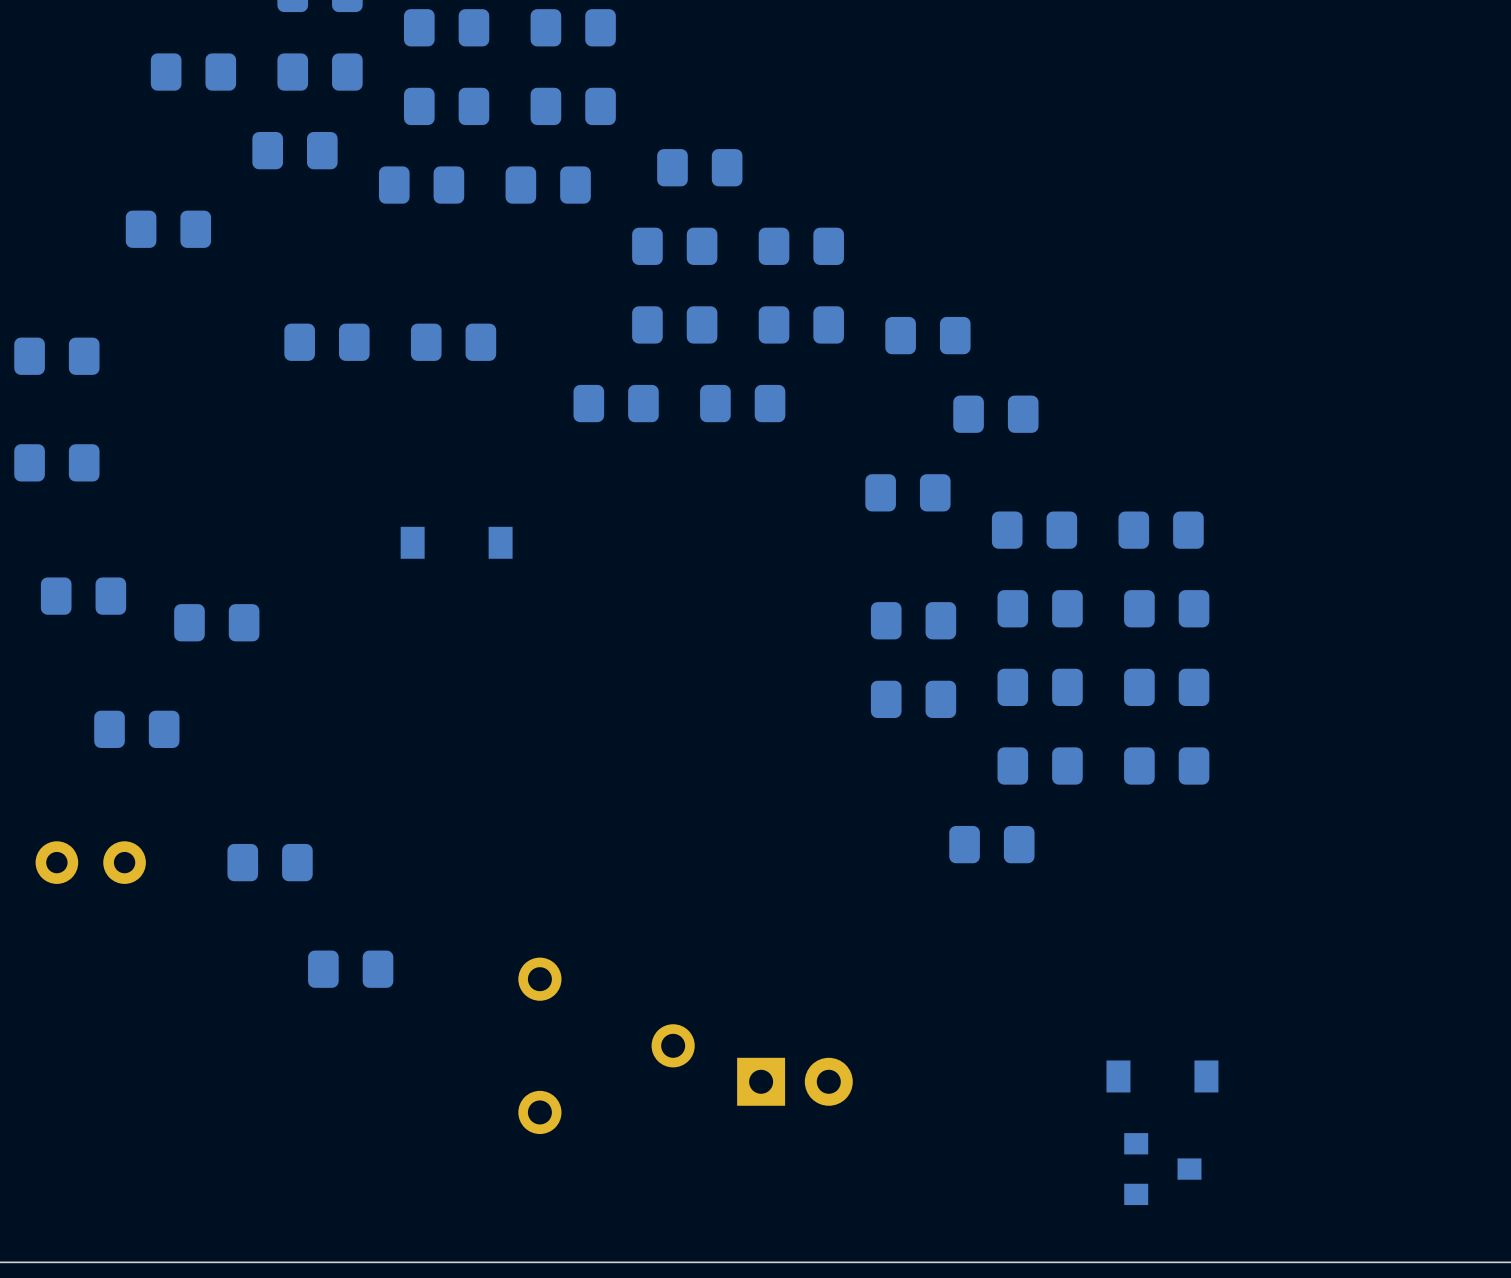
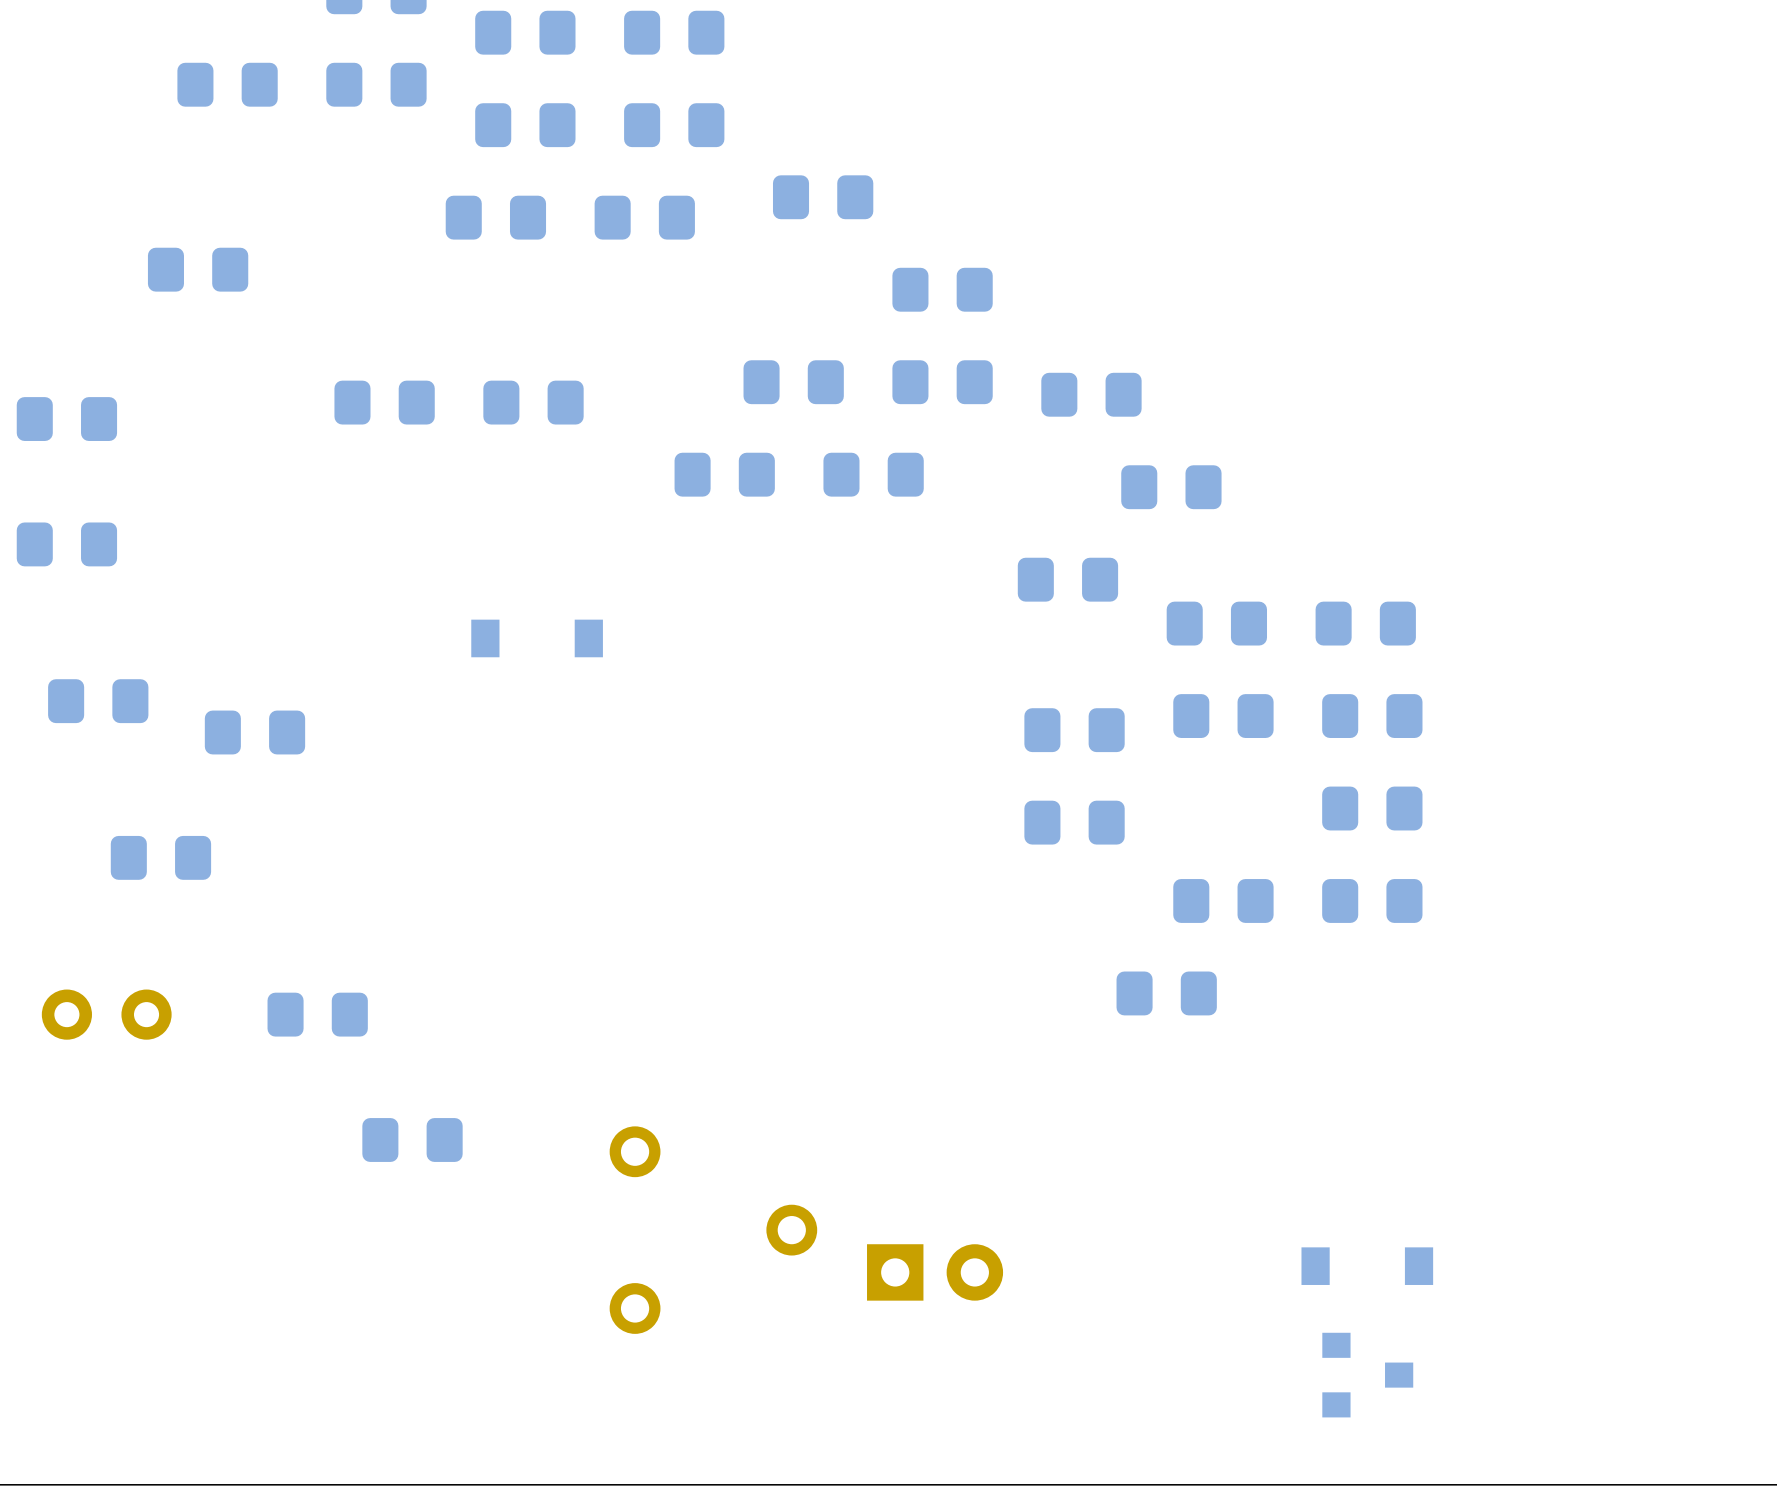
part: (295, 150) -> none
part: (674, 246) -> none
part: (1040, 687) -> none

